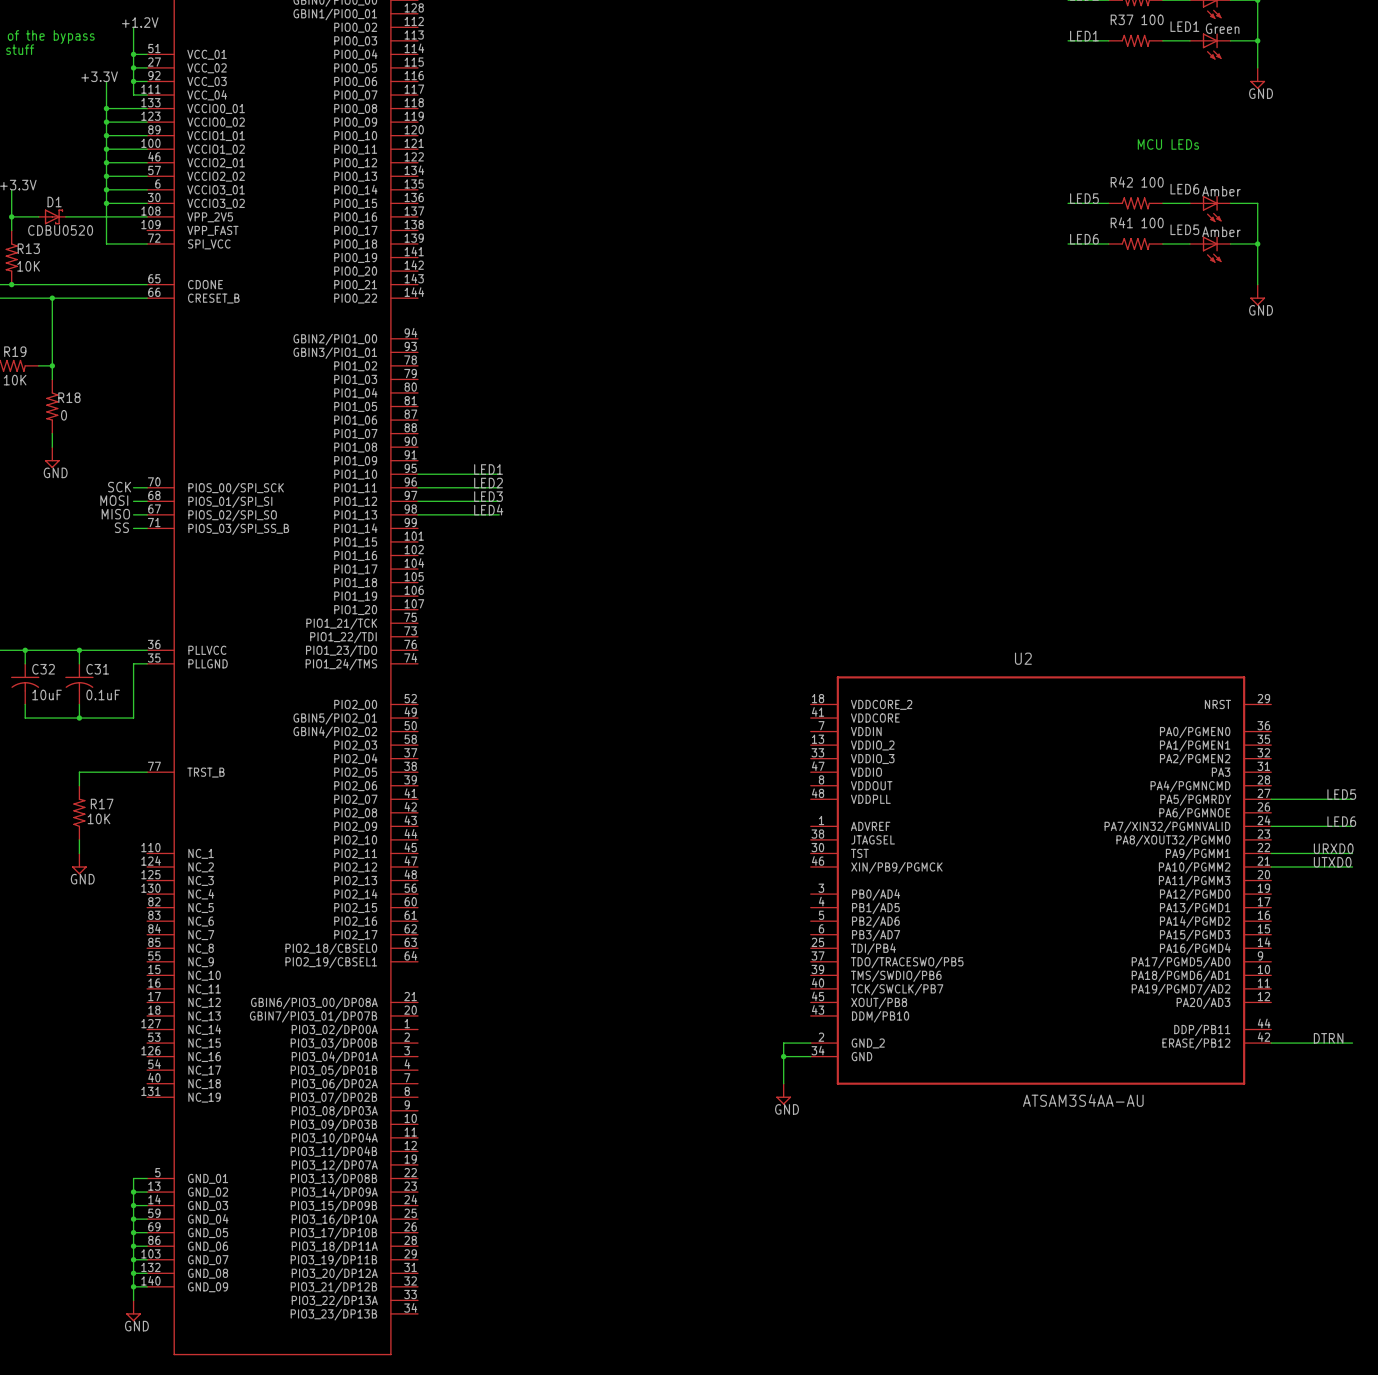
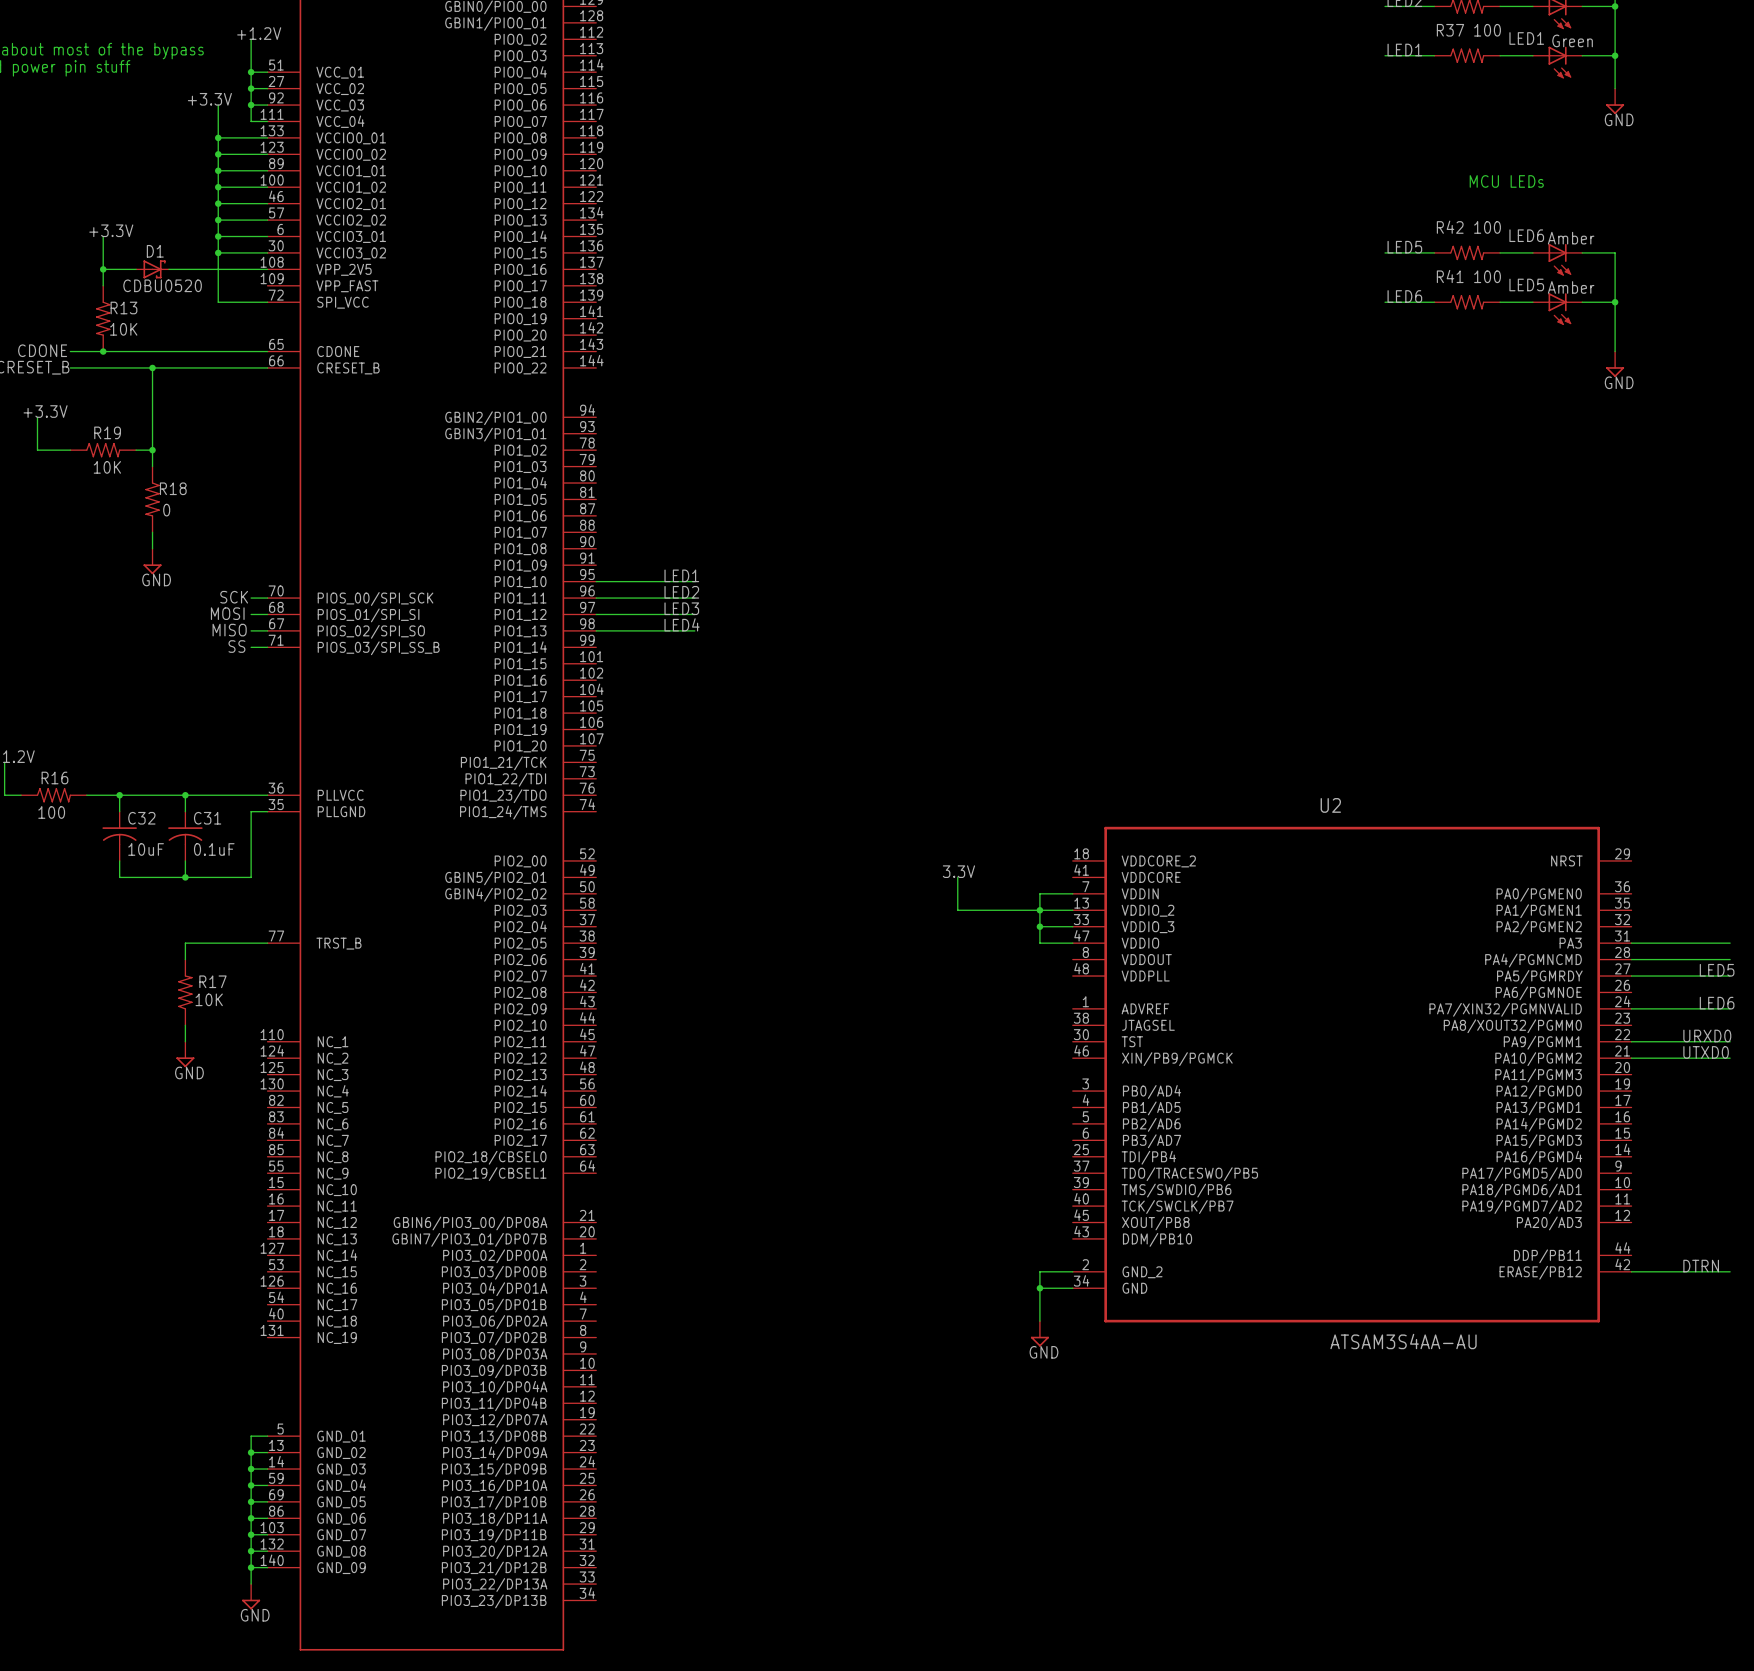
label: none -> 3.3V (958, 871)
wire: none -> (957, 877) (957, 910) (1072, 910)
wire: none -> (1072, 893) (1039, 893) (1039, 943) (1072, 943)
junction: none -> (1039, 910)
wire: none -> (1039, 926) (1072, 926)
junction: none -> (1039, 926)
wire: none -> (1631, 943) (1730, 943)
wire: none -> (1631, 959) (1730, 959)

